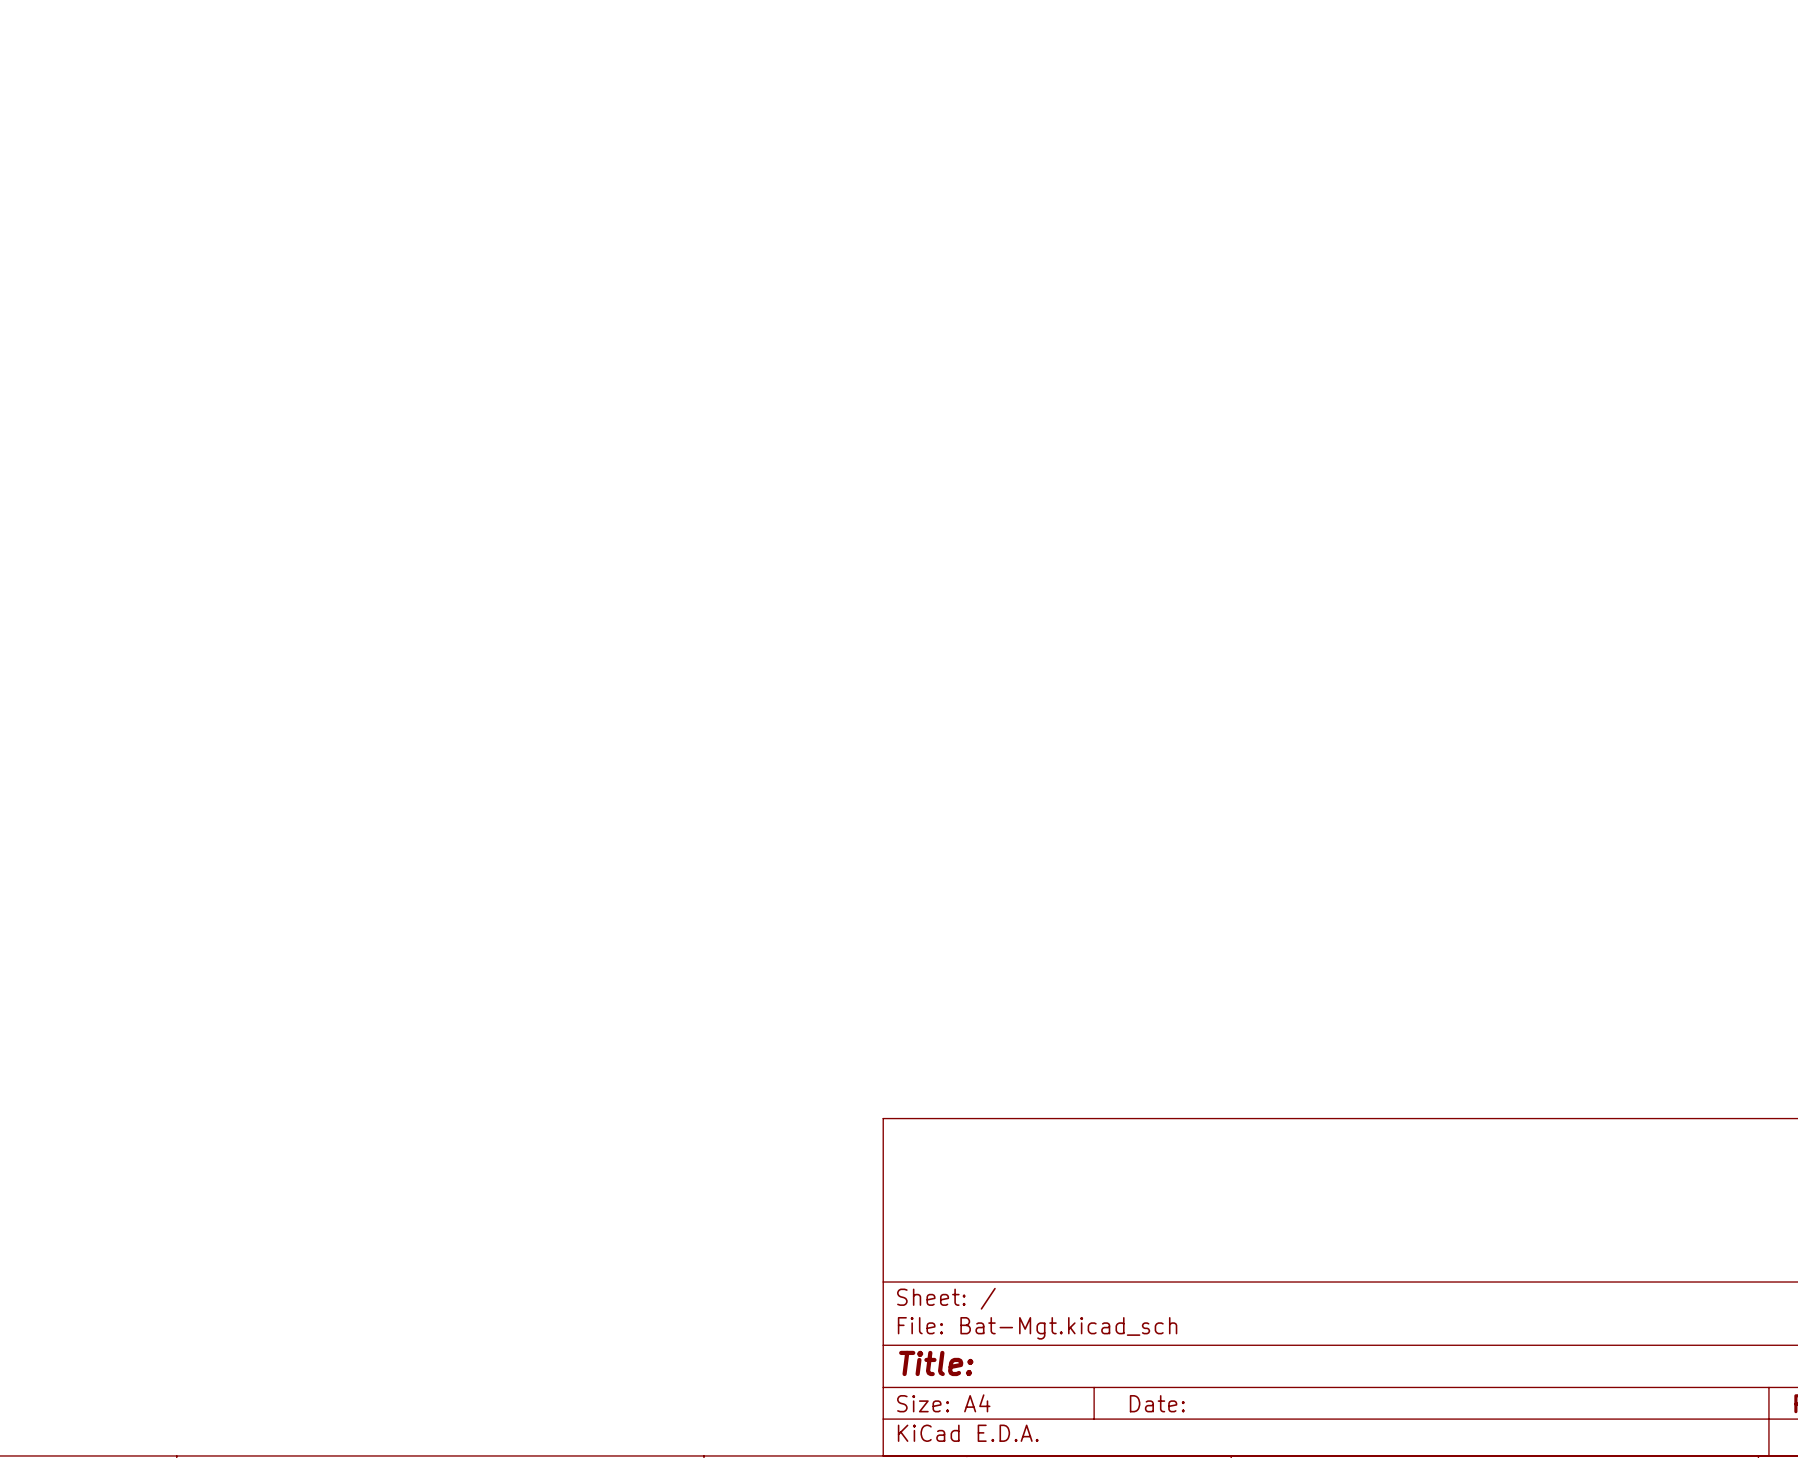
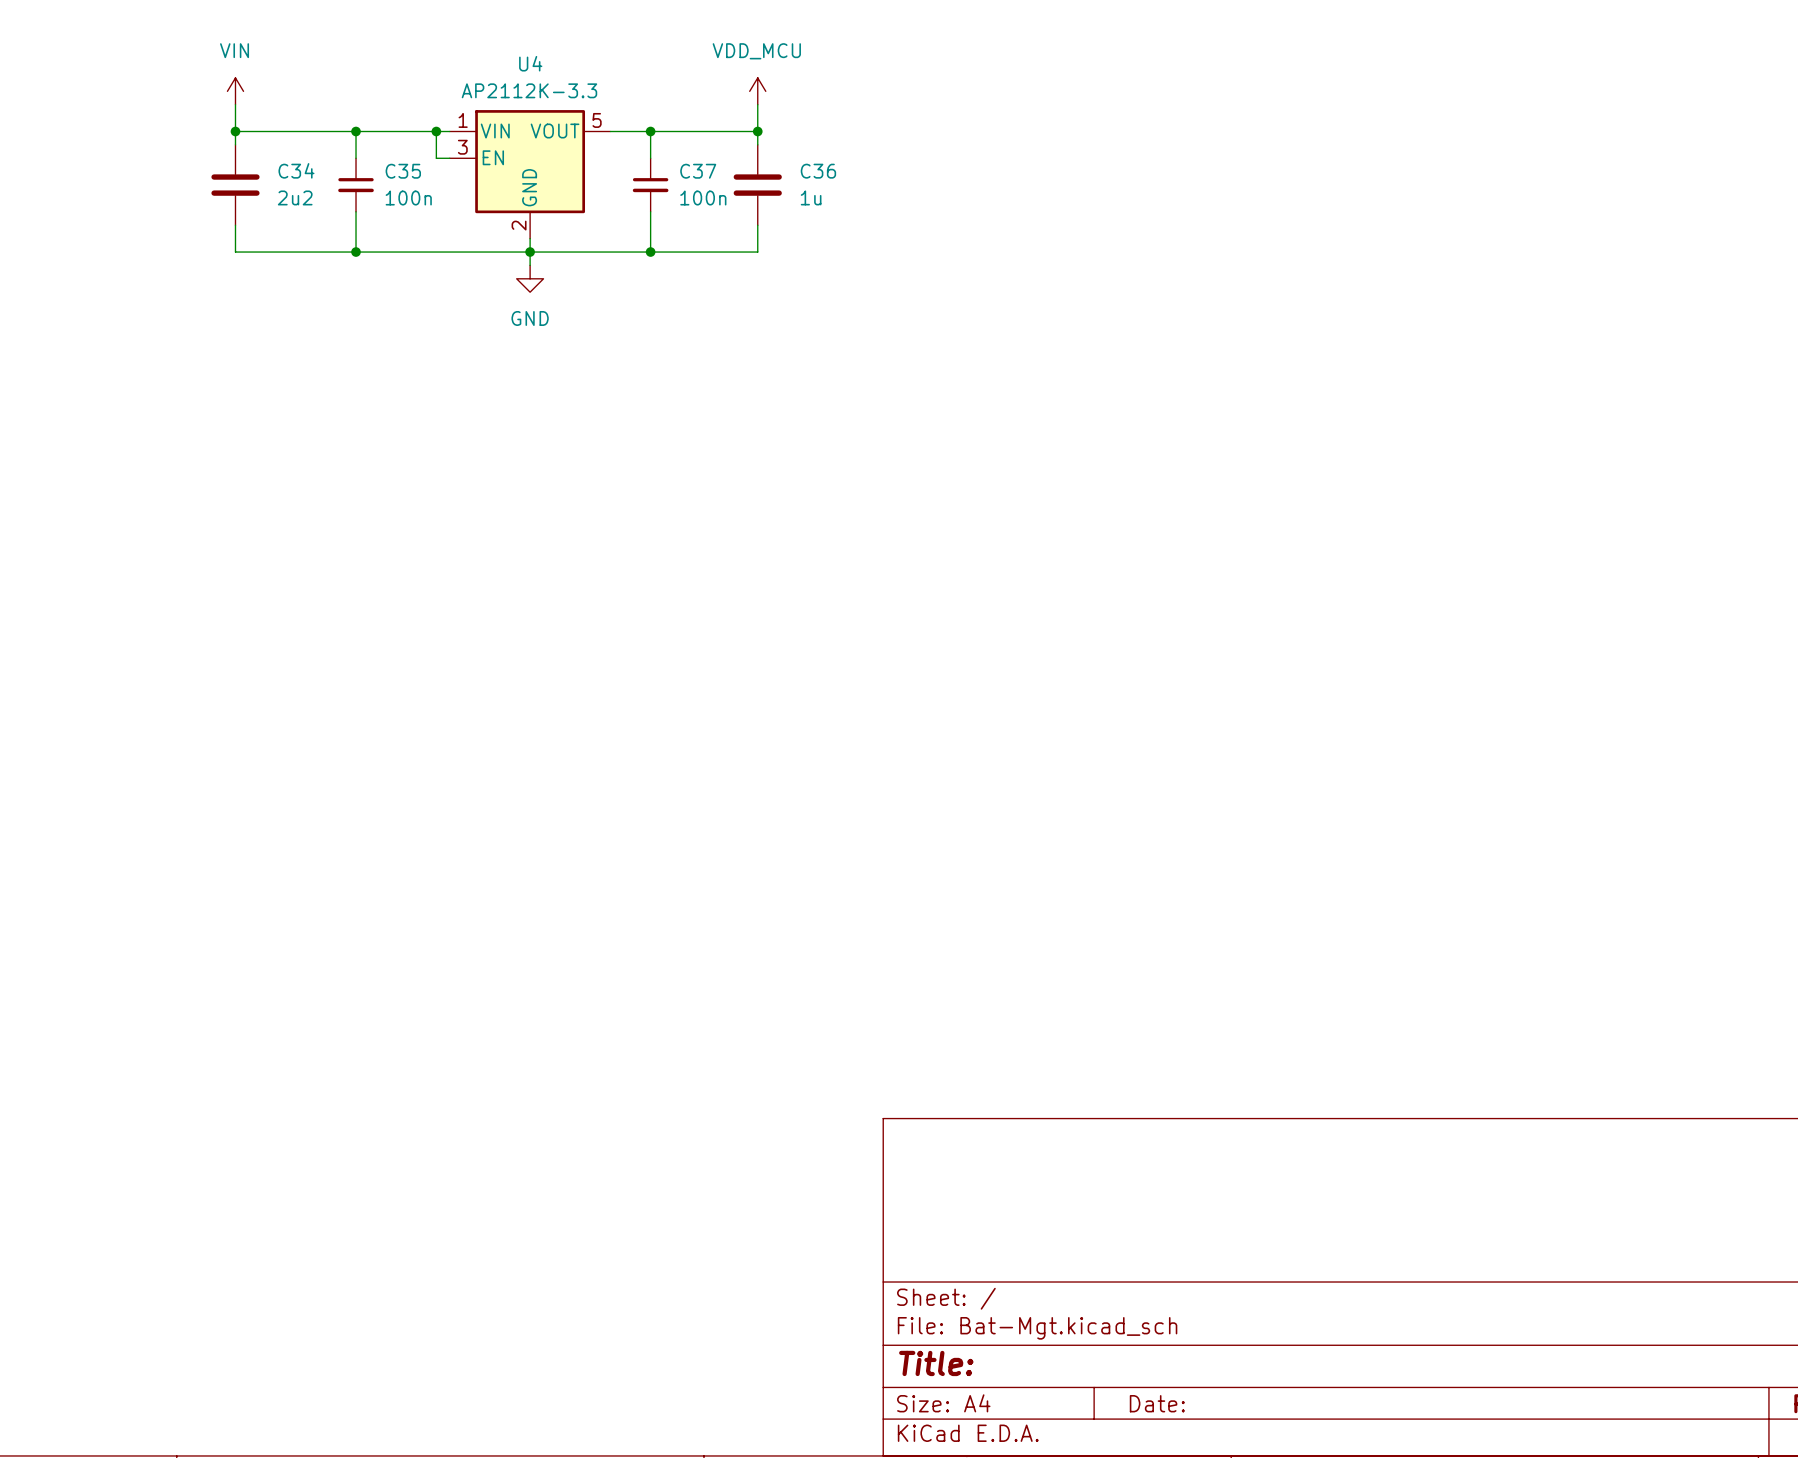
power symbol: none -> VIN (235, 91)
power symbol: none -> VDD_MCU (757, 91)
wire: none -> (235, 104) (235, 144)
wire: none -> (757, 104) (757, 144)
wire: none -> (235, 131) (449, 131)
junction: none -> (235, 131)
wire: none -> (356, 131) (356, 158)
junction: none -> (356, 131)
wire: none -> (436, 131) (436, 158) (449, 158)
junction: none -> (436, 131)
wire: none -> (610, 131) (757, 131)
wire: none -> (650, 131) (650, 158)
junction: none -> (650, 131)
junction: none -> (757, 131)
U4: none -> AP2112K-3.3 (530, 174)
C34: none -> 2u2 (235, 185)
C35: none -> 100n (356, 185)
C37: none -> 100n (650, 185)
C36: none -> 1u (757, 185)
wire: none -> (356, 211) (356, 252)
wire: none -> (650, 211) (650, 252)
wire: none -> (235, 225) (235, 252) (757, 252) (757, 225)
wire: none -> (530, 238) (530, 265)
junction: none -> (356, 252)
junction: none -> (530, 252)
junction: none -> (650, 252)
power symbol: none -> GND (530, 278)

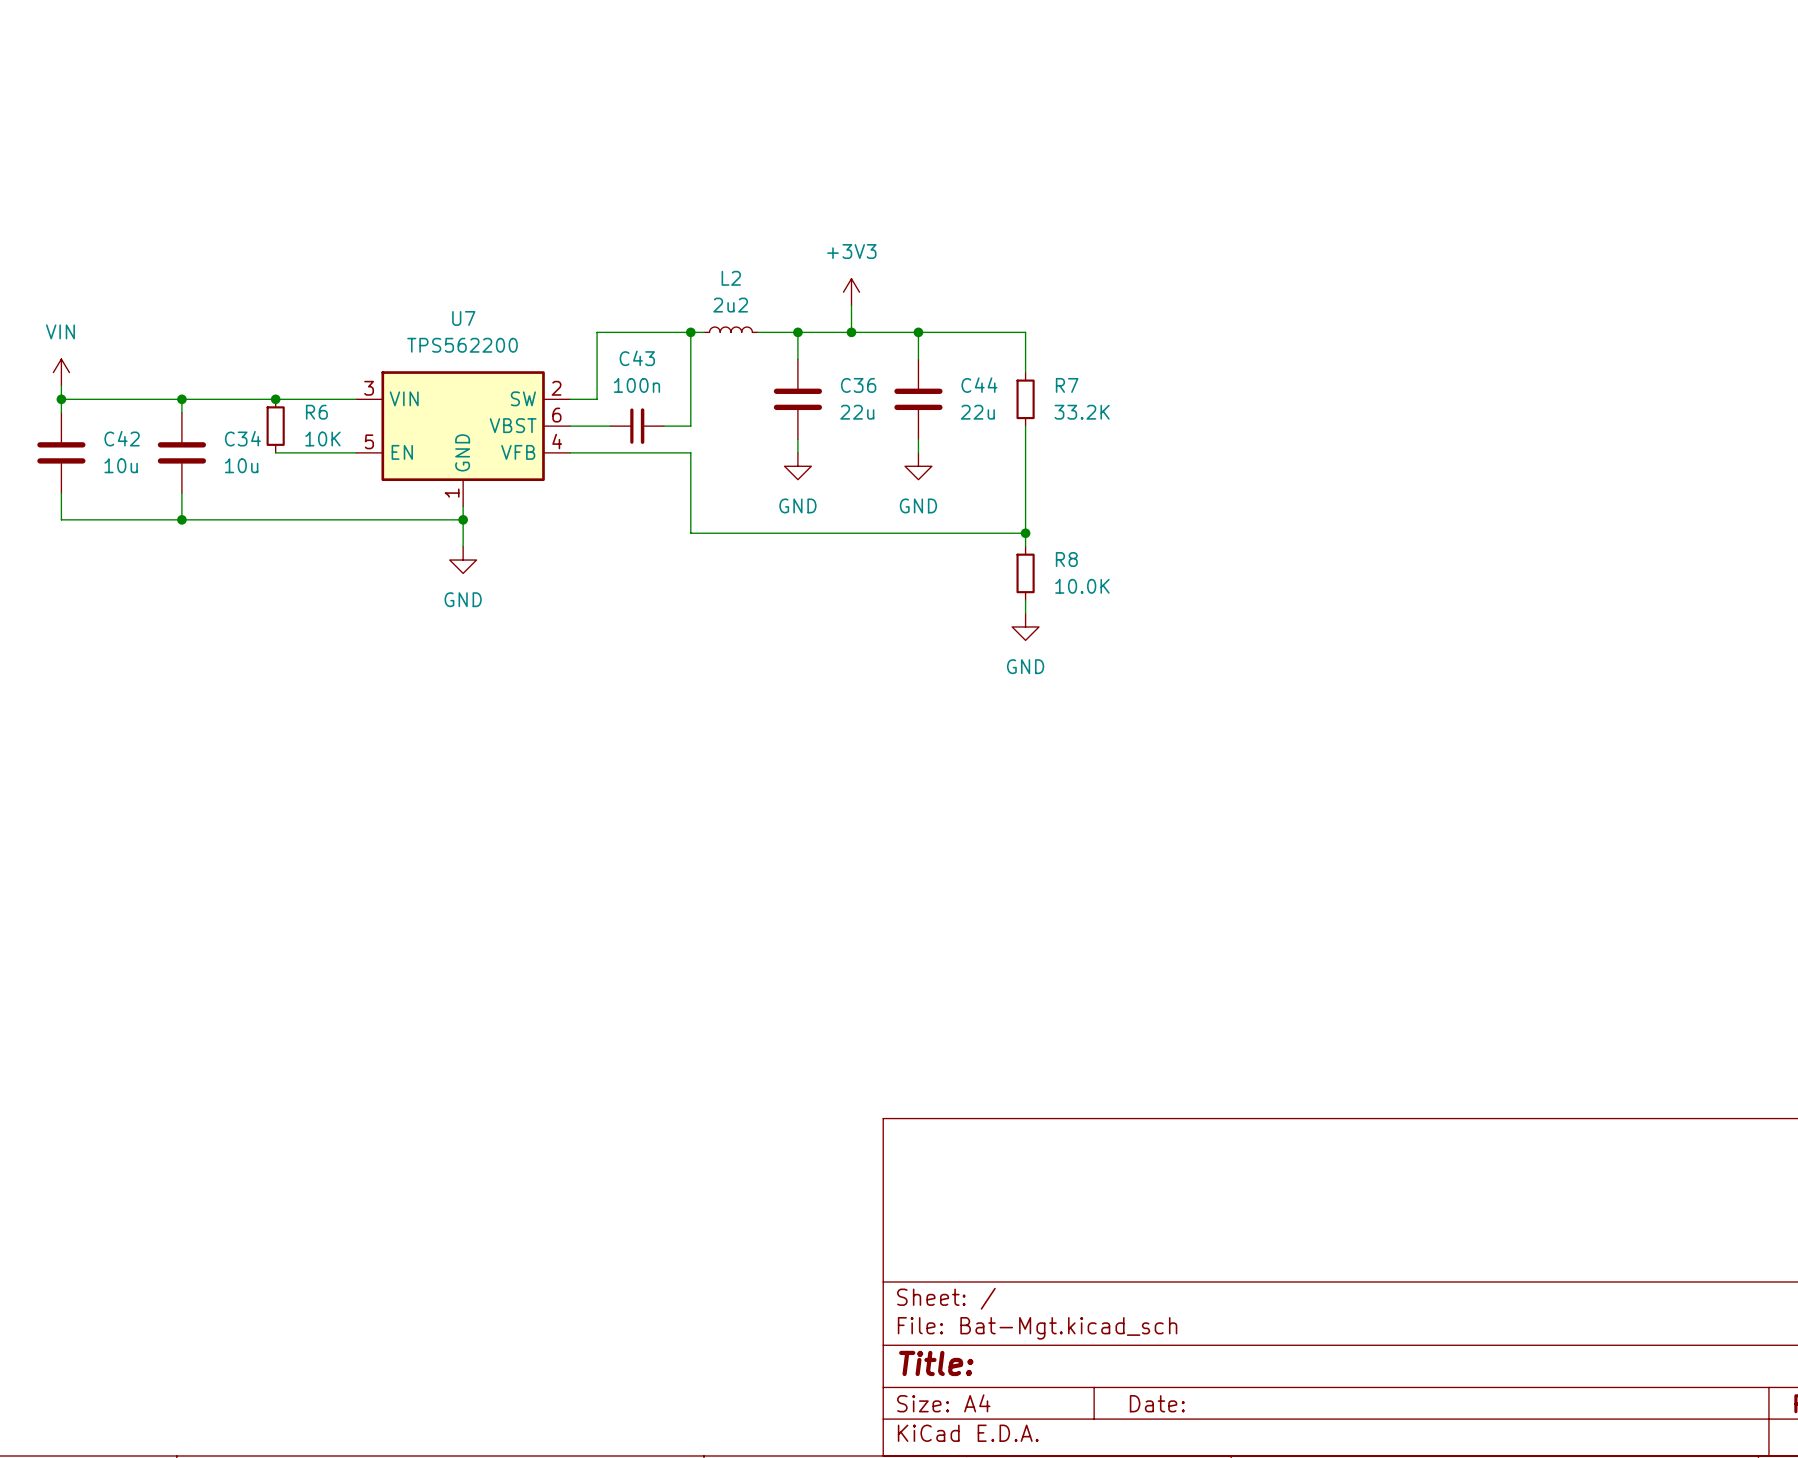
power symbol: VIN (235, 91) -> none
power symbol: VDD_MCU (757, 91) -> none
wire: (235, 104) (235, 144) -> none
wire: (757, 104) (757, 144) -> none
wire: (235, 131) (449, 131) -> none
junction: (235, 131) -> none
wire: (356, 131) (356, 158) -> none
junction: (356, 131) -> none
wire: (436, 131) (436, 158) (449, 158) -> none
junction: (436, 131) -> none
wire: (610, 131) (757, 131) -> none
wire: (650, 131) (650, 158) -> (797, 332) (797, 359)
junction: (650, 131) -> none
junction: (757, 131) -> none
U4: AP2112K-3.3 (530, 174) -> none
C34 position: (235, 185) -> (181, 452)
C35: 100n (356, 185) -> none
C37: 100n (650, 185) -> none
C36 position: (757, 185) -> (797, 399)
C34 value: 2u2 (295, 197) -> 10u (241, 465)
C36 value: 1u (811, 197) -> 22u (857, 412)
wire: (356, 211) (356, 252) -> none
wire: (650, 211) (650, 252) -> none
wire: (235, 225) (235, 252) (757, 252) (757, 225) -> none
wire: (530, 238) (530, 265) -> none
junction: (356, 252) -> none
junction: (530, 252) -> none
junction: (650, 252) -> none
power symbol: GND (530, 278) -> none
power symbol: none -> +3V3 (851, 292)
wire: none -> (851, 305) (851, 332)
L2: none -> 2u2 (730, 329)
wire: none -> (690, 332) (690, 426) (664, 426)
junction: none -> (690, 332)
wire: none -> (704, 332) (597, 332) (597, 399) (570, 399)
wire: none -> (757, 332) (1025, 332) (1025, 372)
junction: none -> (797, 332)
junction: none -> (851, 332)
wire: none -> (918, 332) (918, 359)
junction: none -> (918, 332)
power symbol: none -> VIN (61, 372)
wire: none -> (61, 385) (61, 412)
wire: none -> (61, 399) (356, 399)
junction: none -> (61, 399)
wire: none -> (181, 399) (181, 412)
junction: none -> (181, 399)
junction: none -> (275, 399)
C44: none -> 22u (918, 399)
R7: none -> 33.2K (1025, 399)
R6: none -> 10K (275, 426)
wire: none -> (570, 426) (610, 426)
C43: none -> 100n (637, 426)
wire: none -> (1025, 426) (1025, 546)
U7: none -> TPS562200 (463, 438)
wire: none -> (797, 439) (797, 452)
wire: none -> (918, 439) (918, 452)
C42: none -> 10u (61, 452)
wire: none -> (275, 452) (356, 452)
wire: none -> (570, 452) (690, 452) (690, 533) (1025, 533)
power symbol: none -> GND (797, 466)
power symbol: none -> GND (918, 466)
wire: none -> (61, 493) (61, 519) (463, 519)
wire: none -> (181, 493) (181, 519)
wire: none -> (463, 506) (463, 546)
junction: none -> (181, 519)
junction: none -> (463, 519)
junction: none -> (1025, 533)
power symbol: none -> GND (463, 560)
R8: none -> 10.0K (1025, 573)
wire: none -> (1025, 600) (1025, 613)
power symbol: none -> GND (1025, 626)

